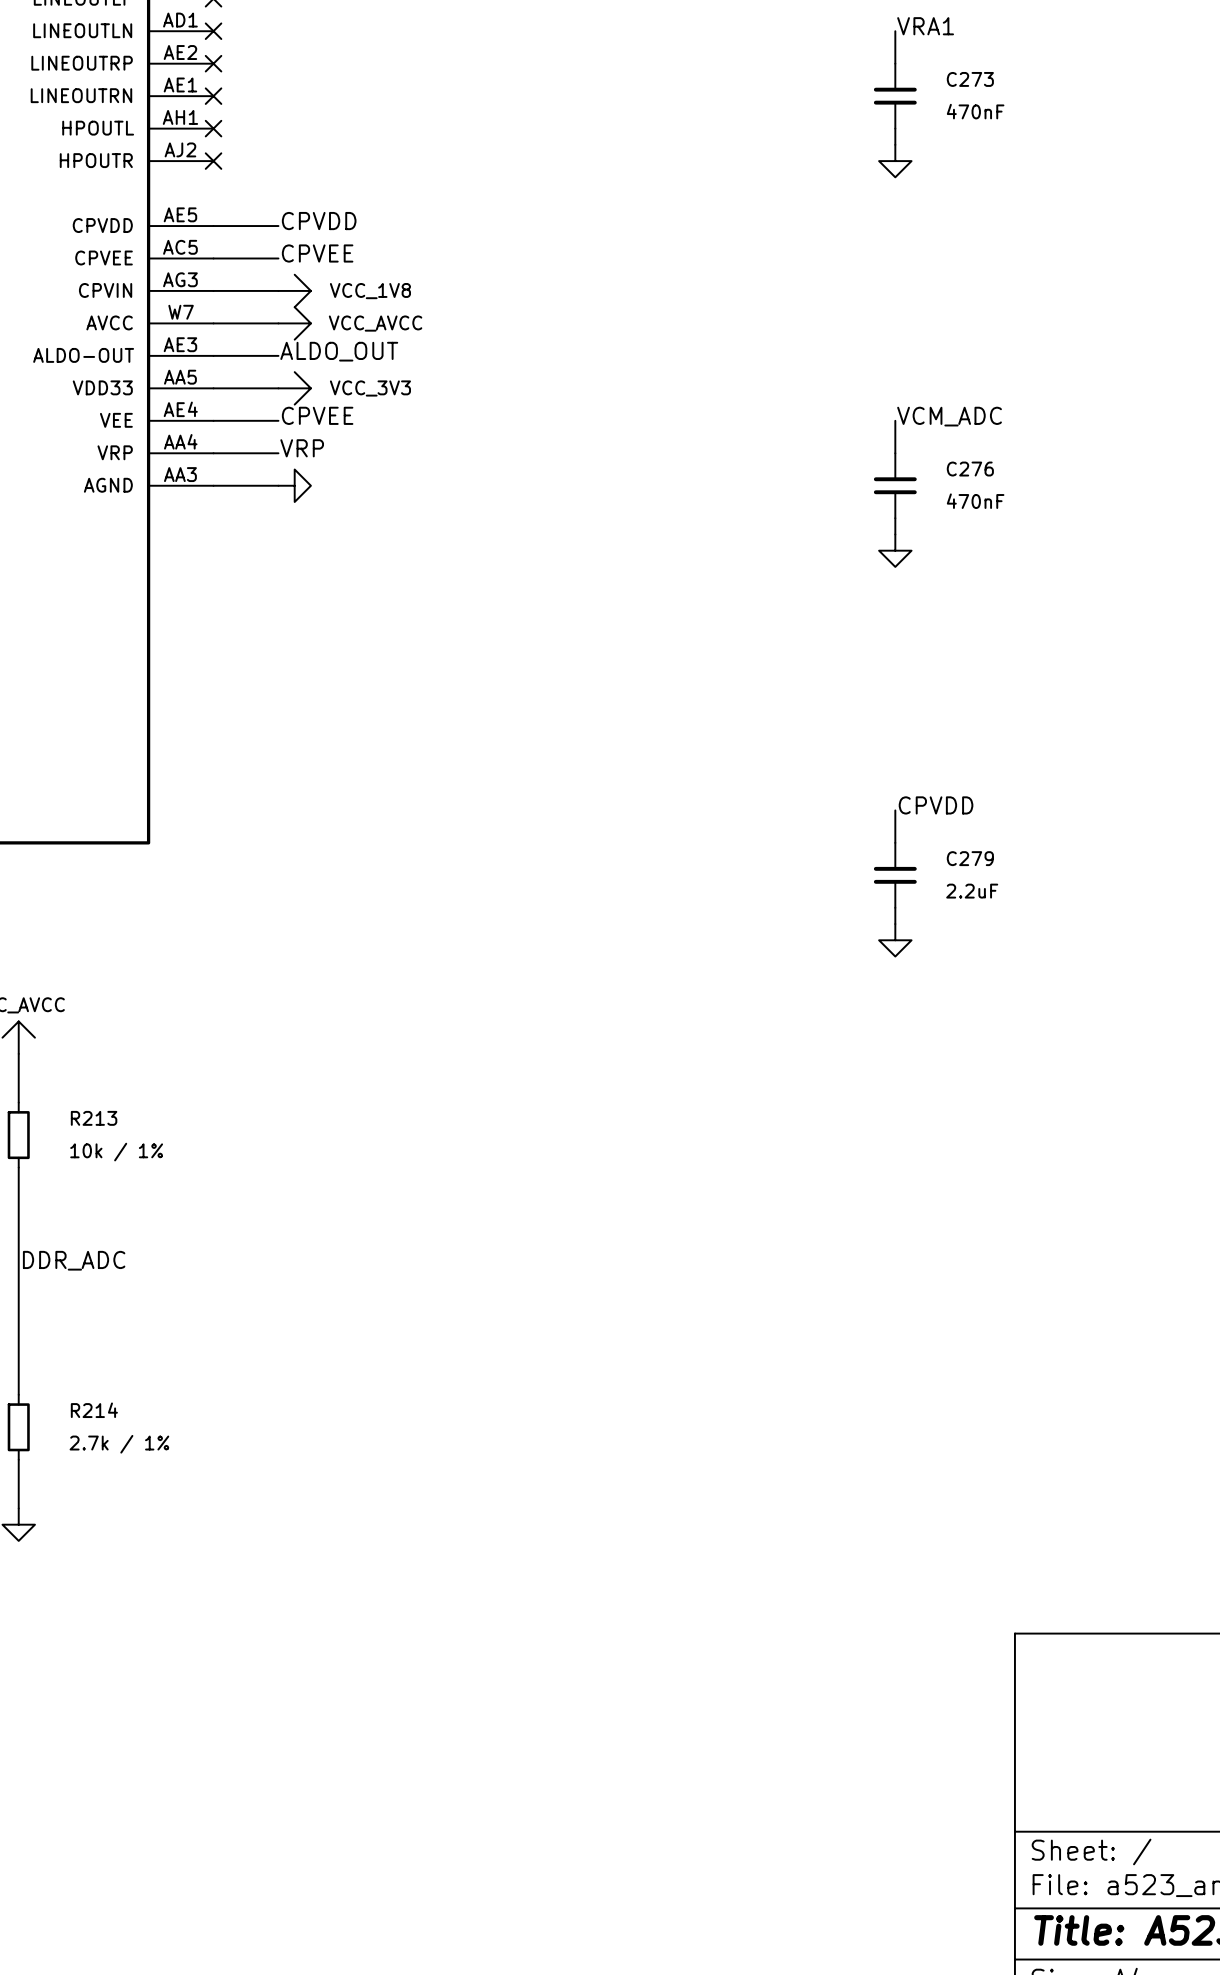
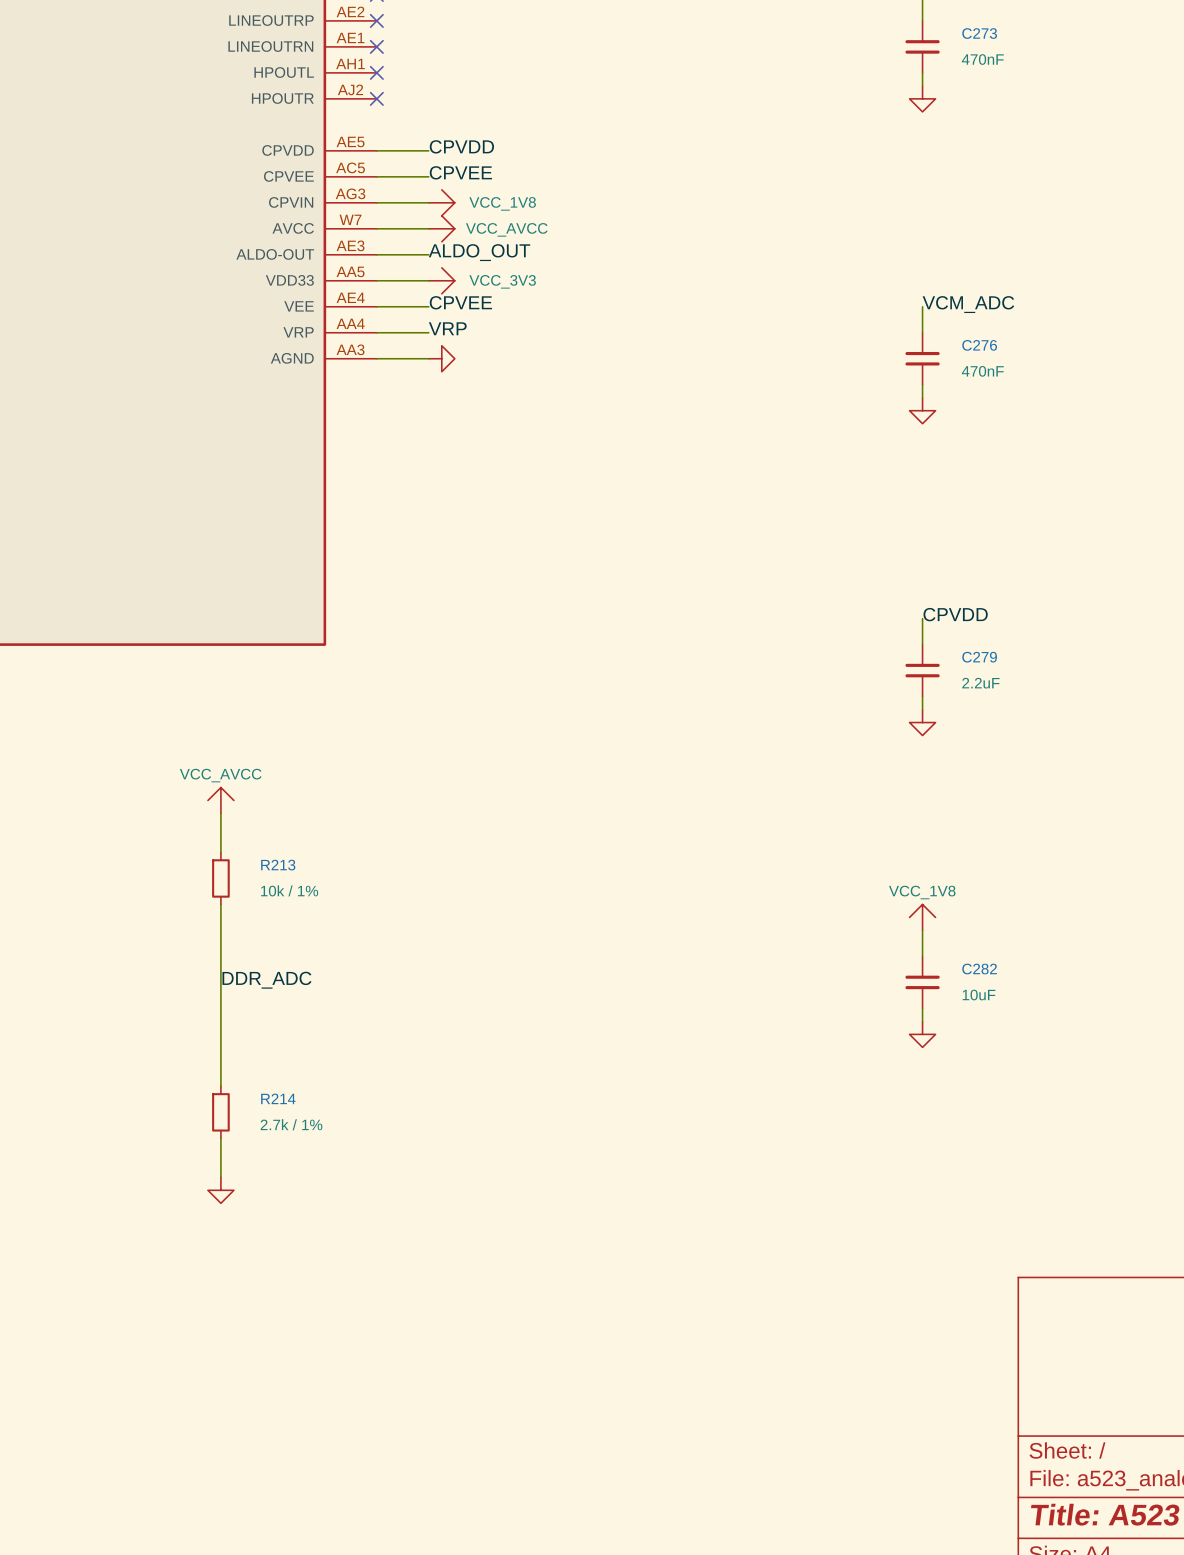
power symbol: none -> VCC_1V8 (922, 917)
wire: none -> (922, 930) (922, 956)
C282: none -> 10uF (922, 982)
wire: none -> (922, 1008) (922, 1021)
power symbol: none -> (922, 1034)

